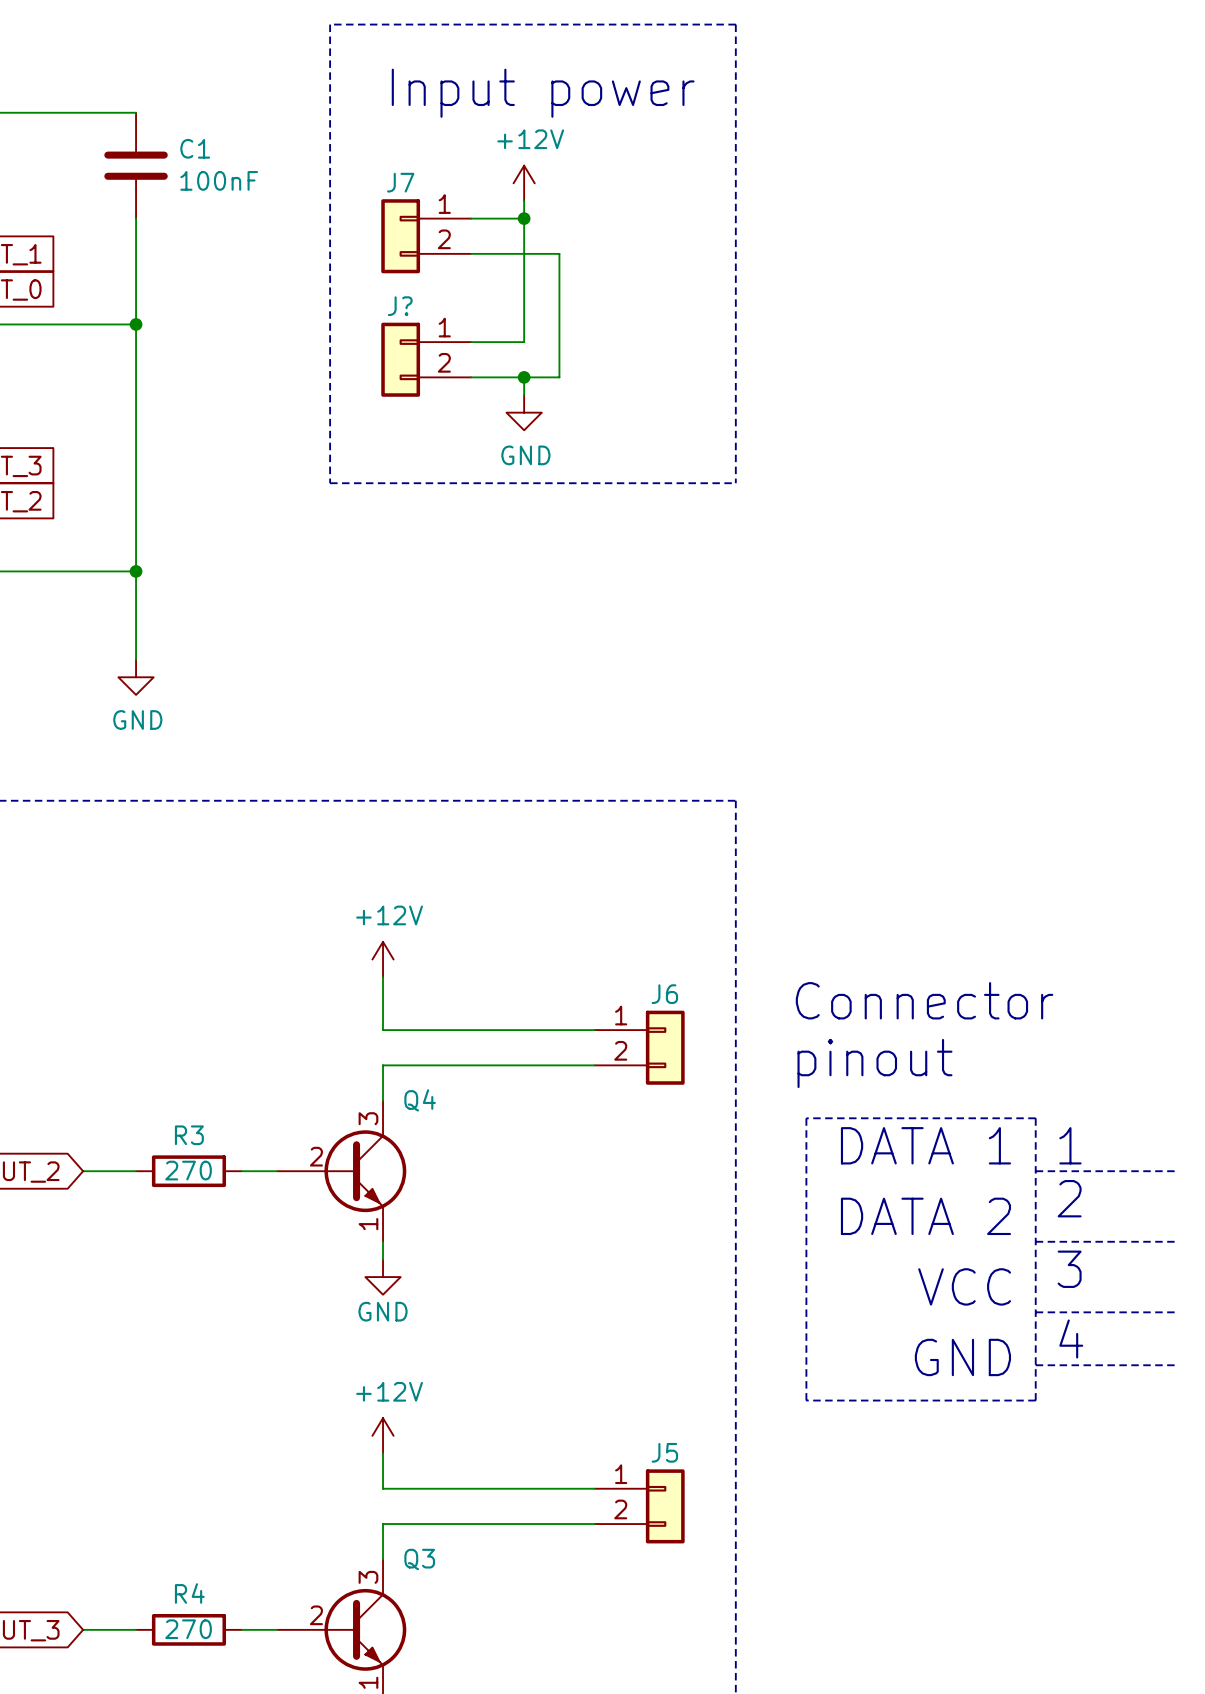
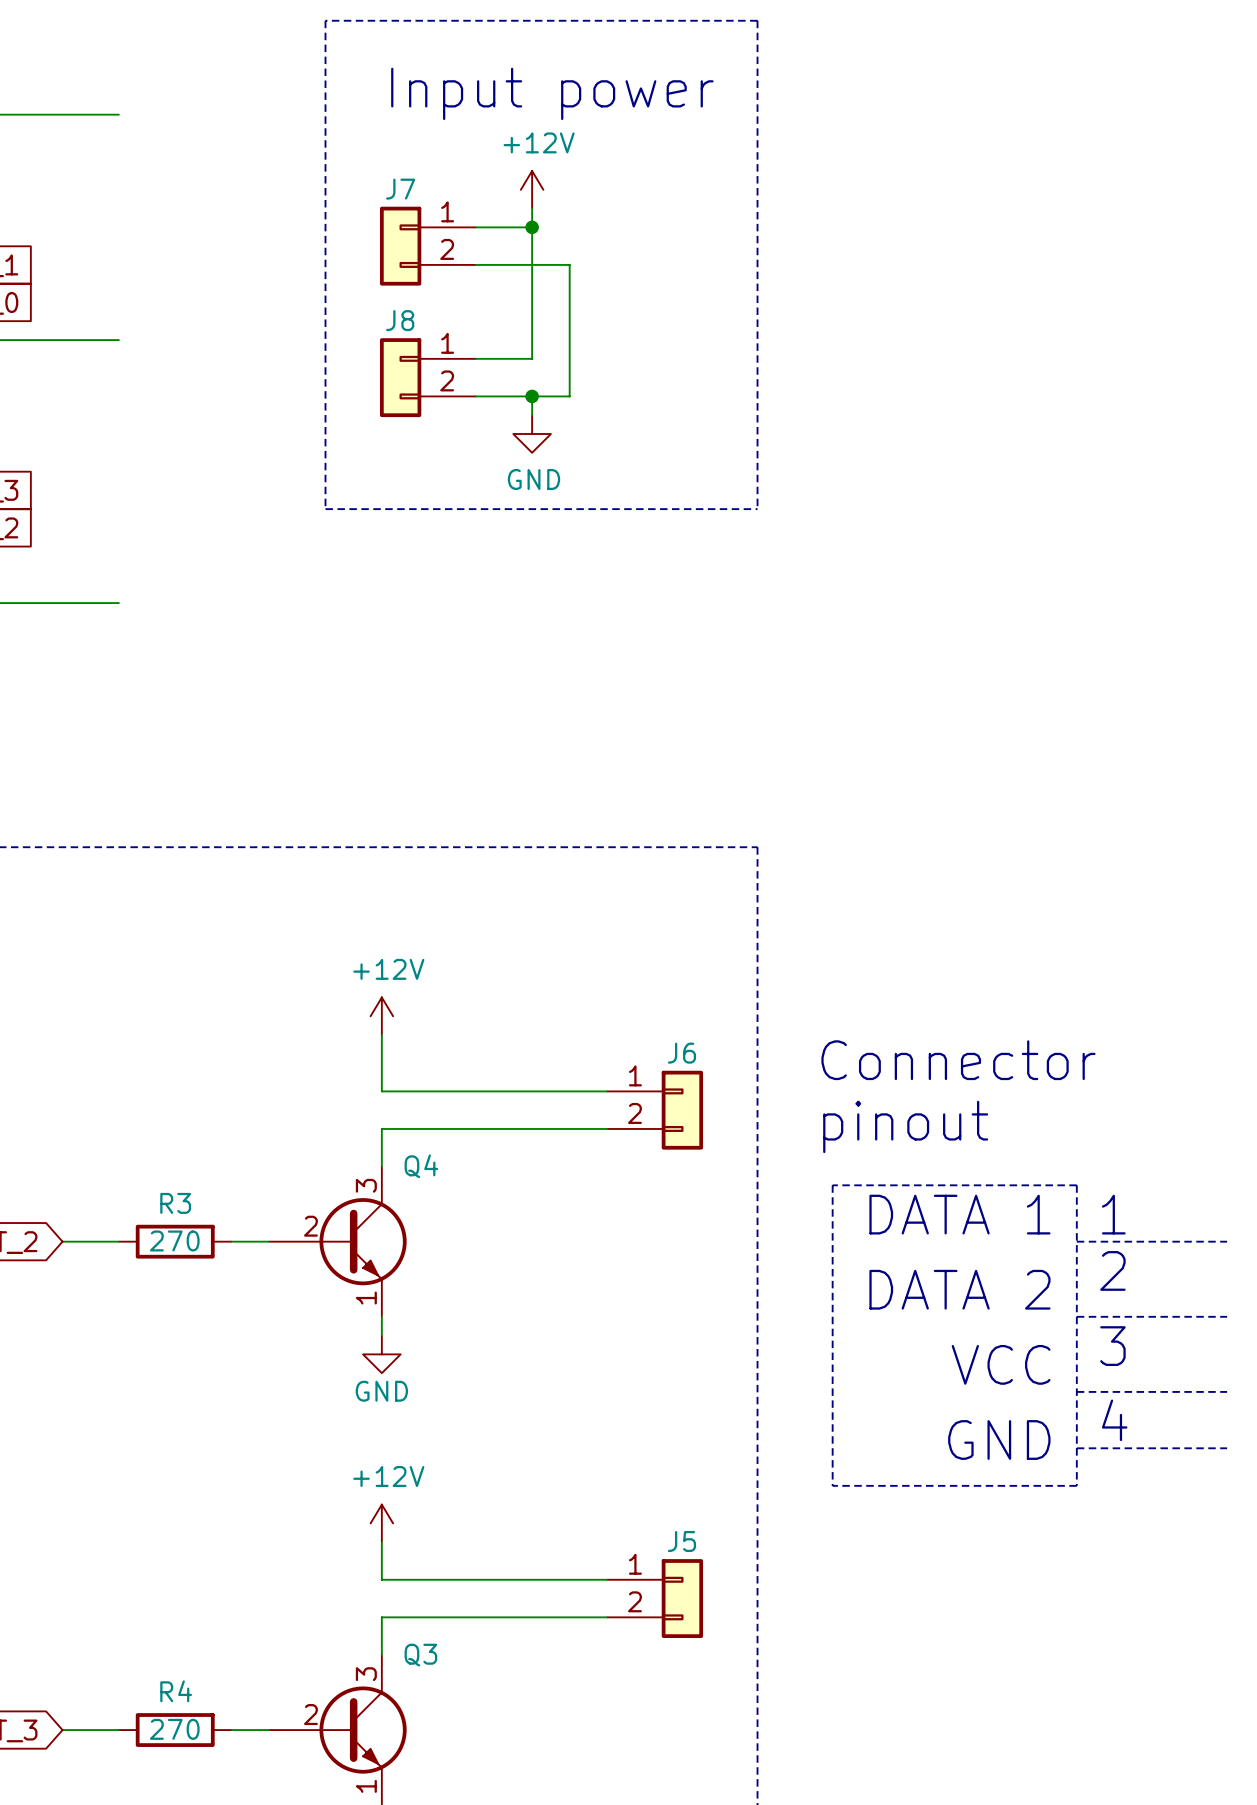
C1: 100nF (136, 165) -> none
wire: (136, 218) (136, 659) -> none
J? name: J? (400, 306) -> J8 (400, 320)
junction: (136, 324) -> none
junction: (136, 571) -> none
power symbol: GND (136, 677) -> none

